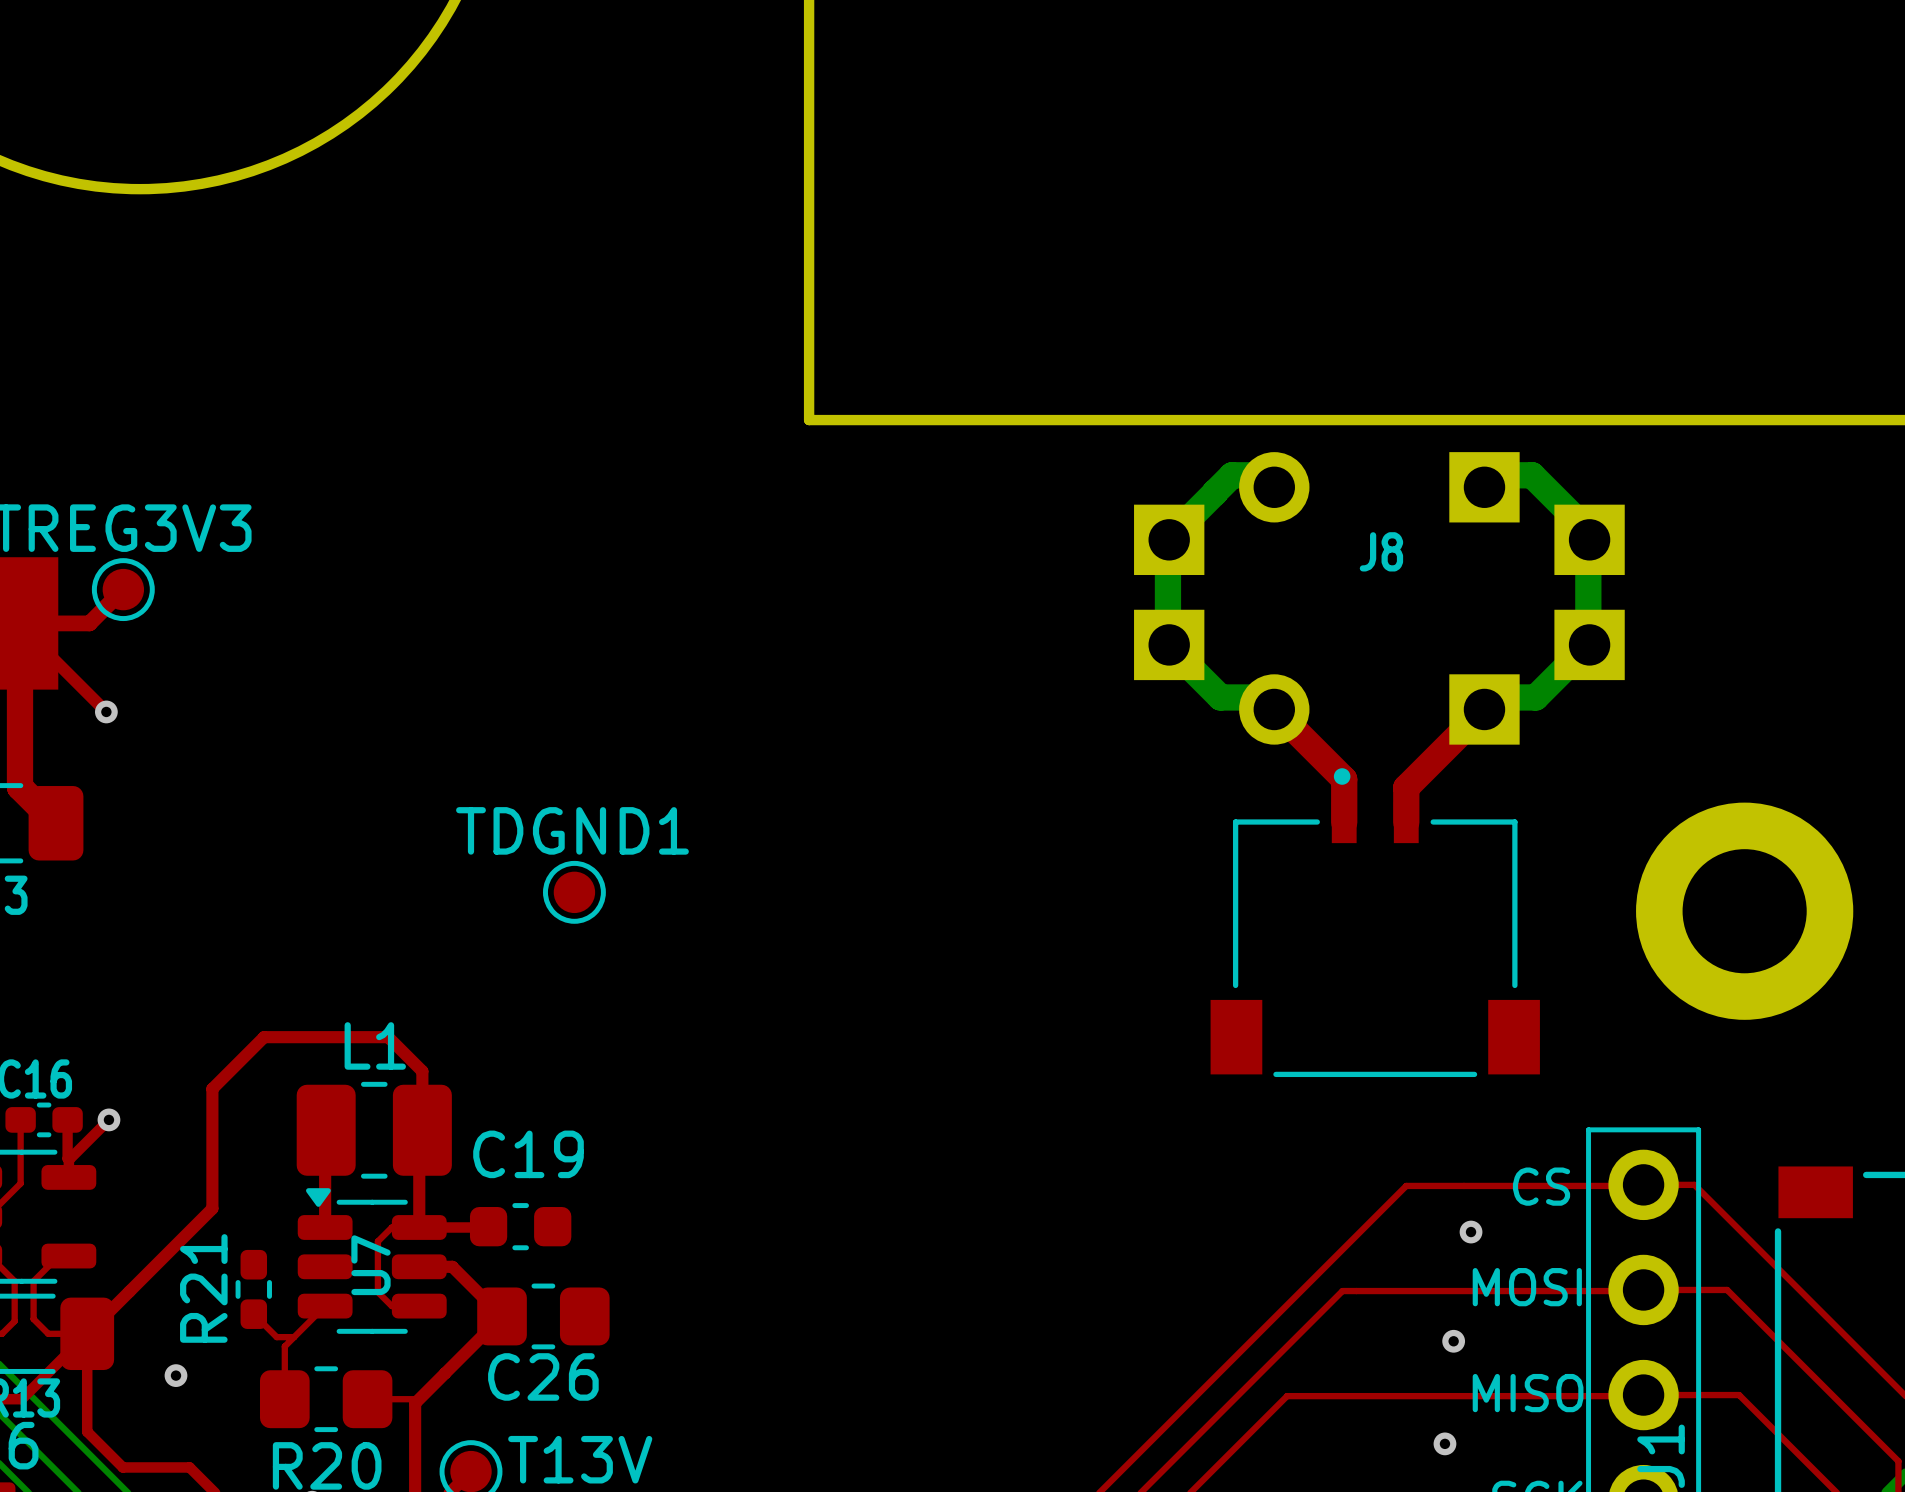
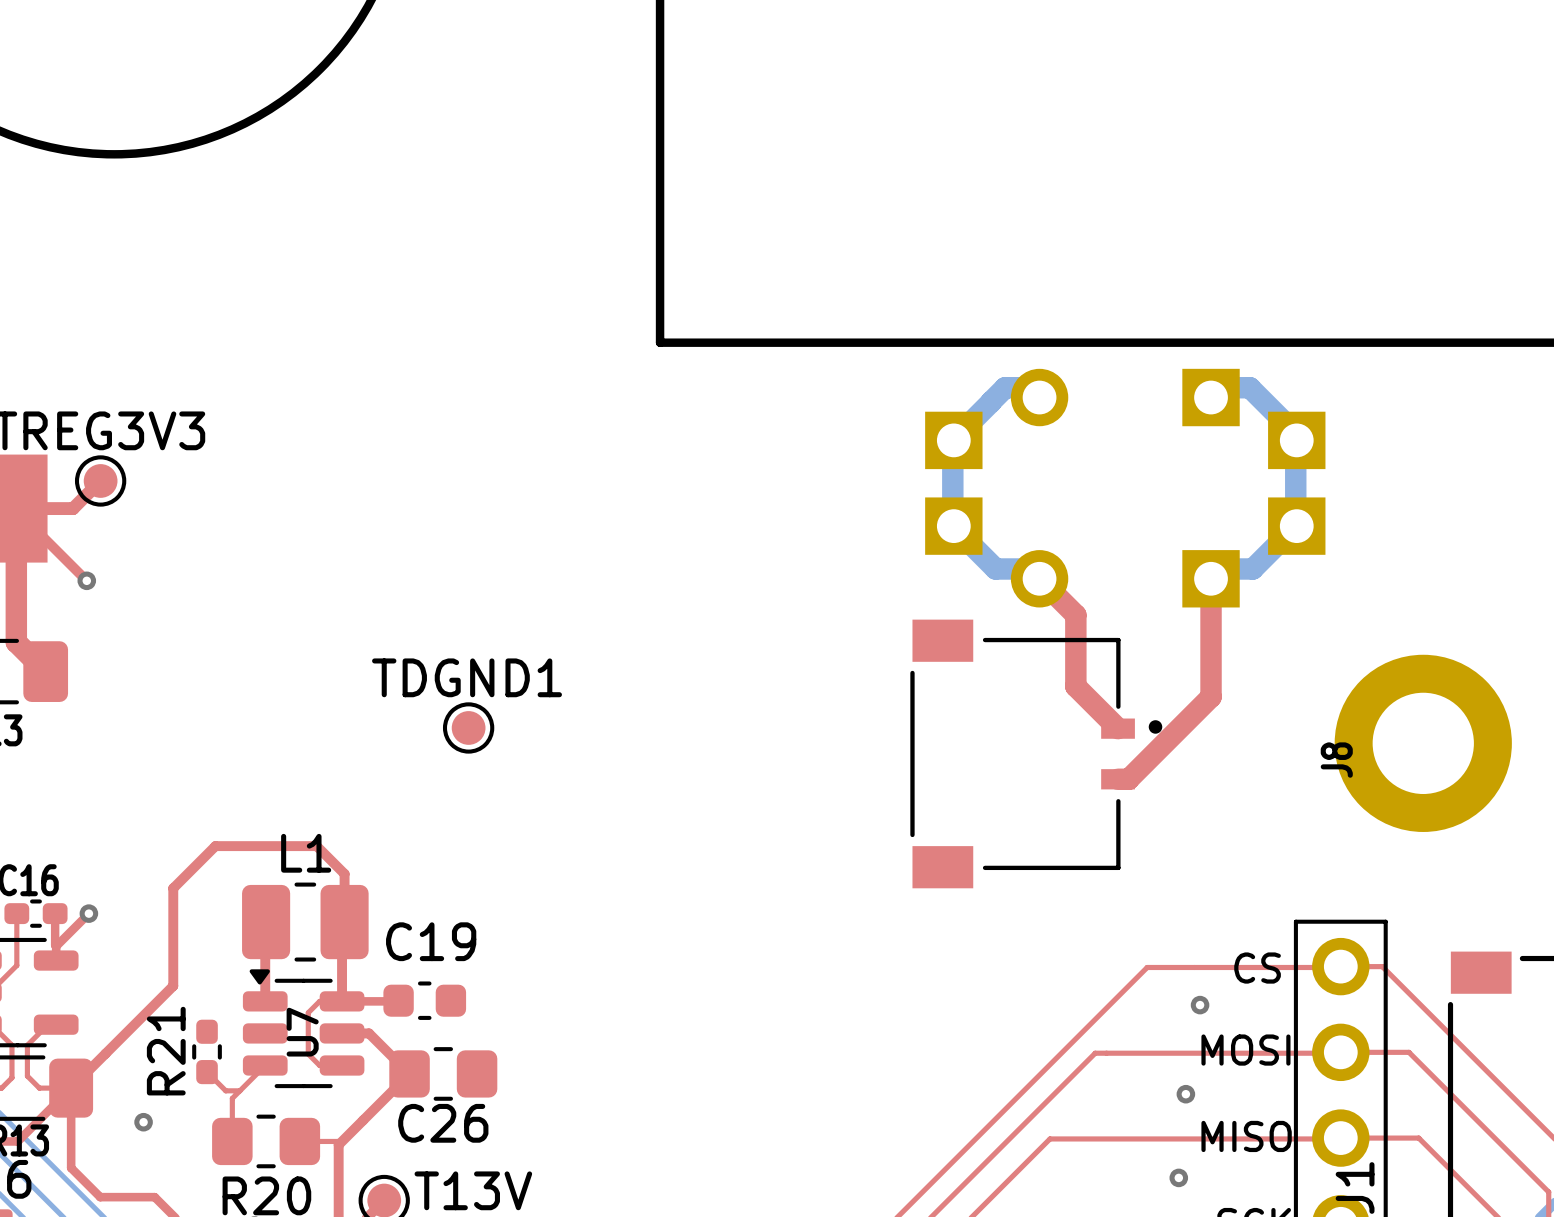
top track: (1484, 709) (1406, 787) (1406, 822) -> (1211, 578) (1211, 696) (1128, 779) (1118, 779)
top track: (1318, 753) (1344, 779) (1344, 822) -> (1075, 615) (1075, 686) (1118, 728)
J8 rotation: 0° (1375, 922) -> 90° clockwise (1036, 753)

